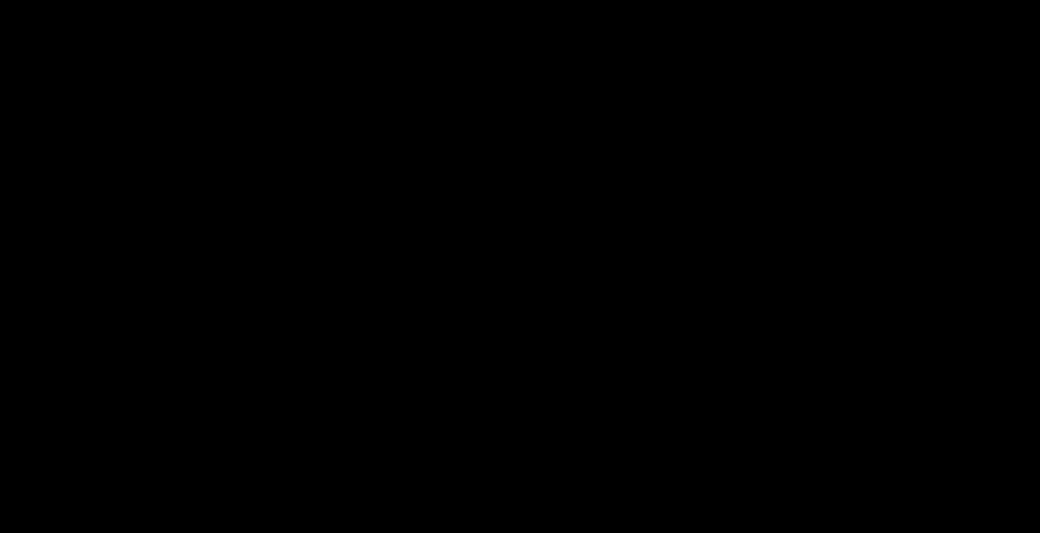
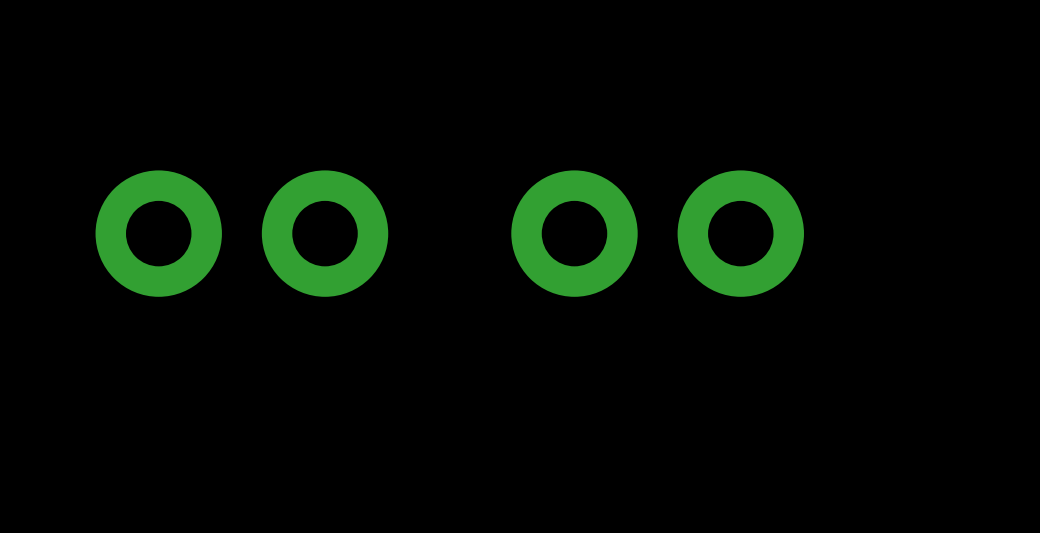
part: none -> (241, 233)
part: none -> (657, 233)

